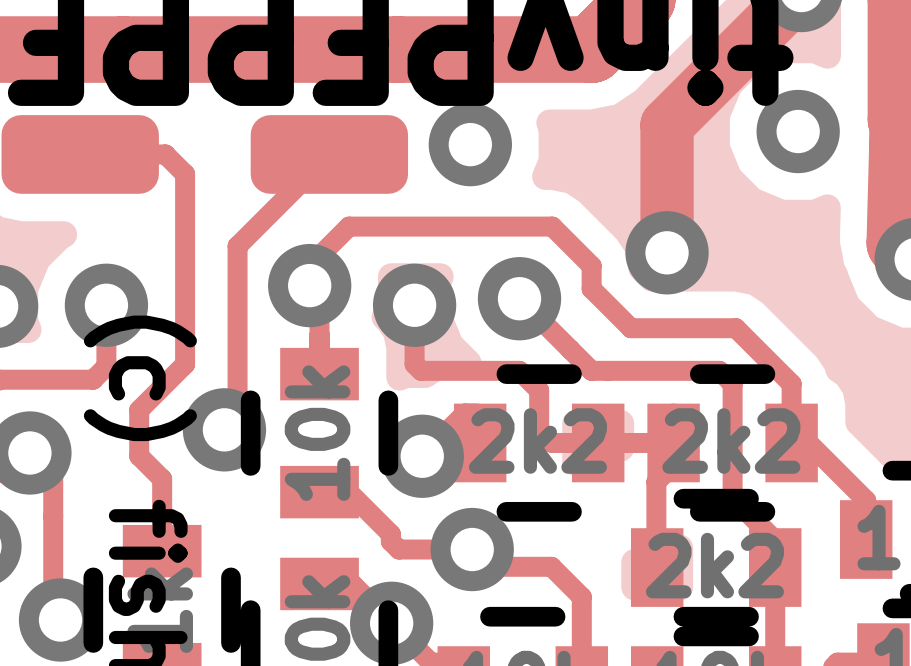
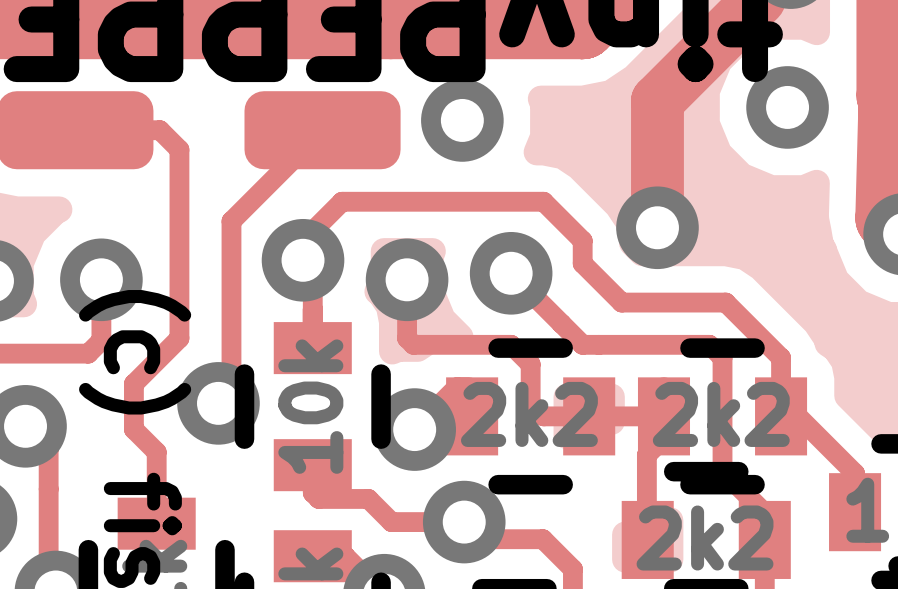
track: (341, 492) (348, 492) (390, 534) (390, 541) -> (312, 465) (312, 492) (318, 498) (368, 498) (383, 514)

